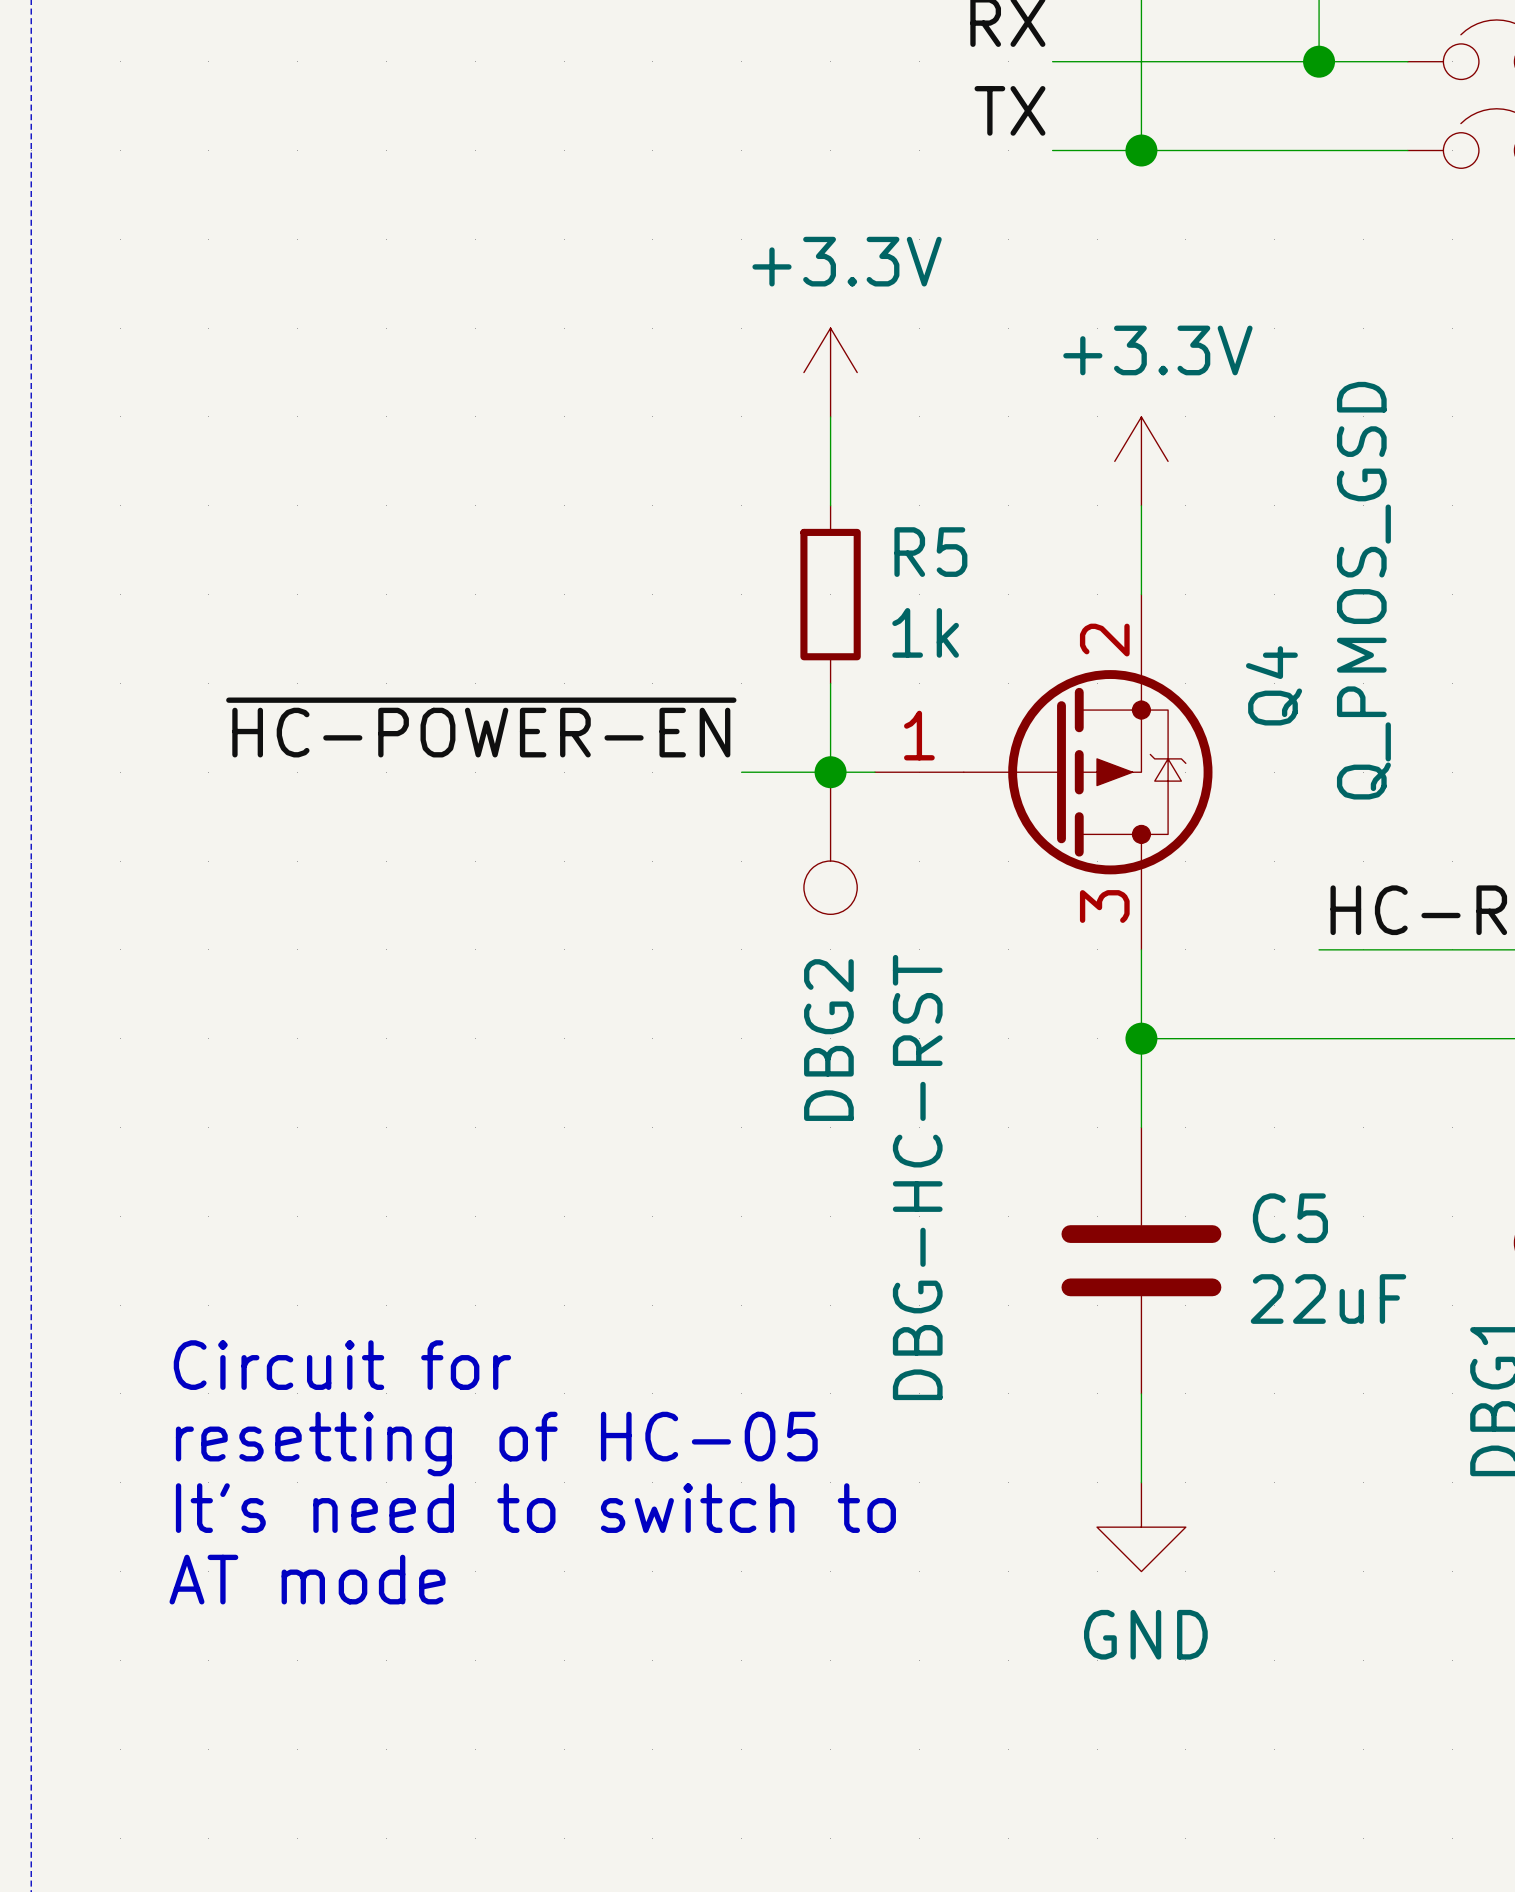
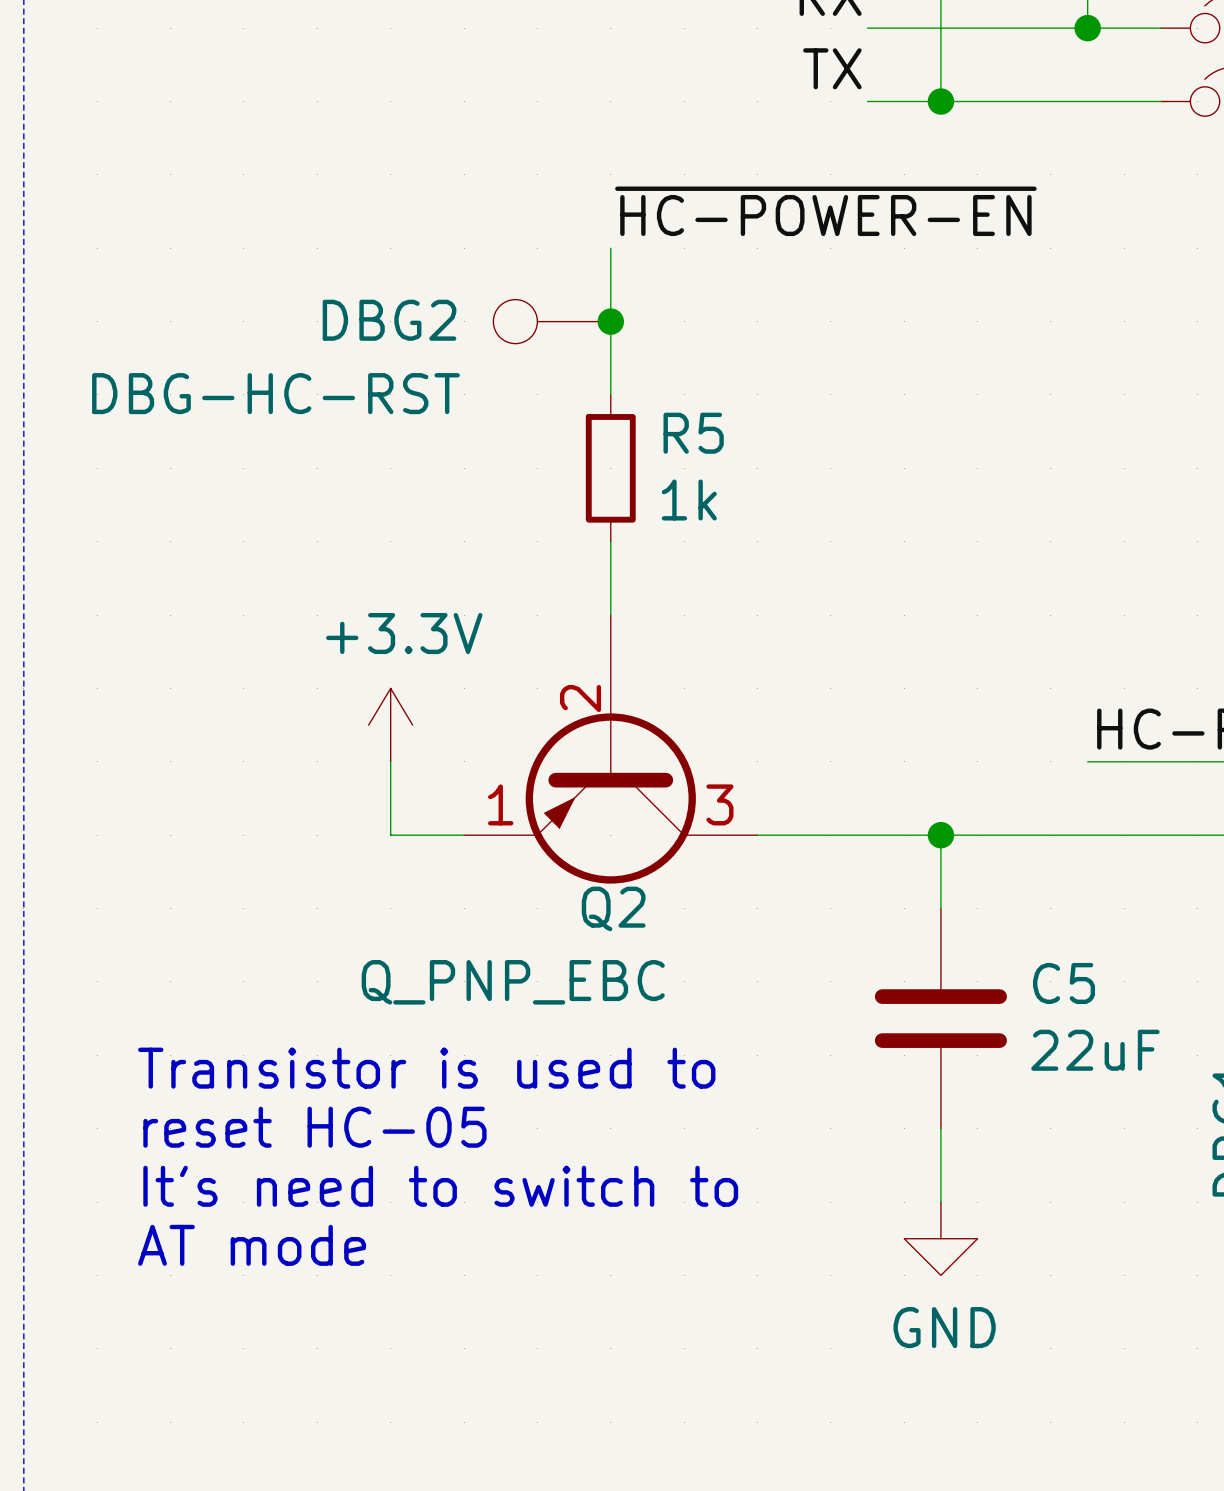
wire: none -> (610, 248) (610, 394)
power symbol: +3.3V (830, 372) -> none
junction: none -> (610, 321)
wire: (830, 416) (830, 505) -> none
power symbol: +3.3V (1141, 461) -> none
wire: (1141, 505) (1141, 594) -> none
R5 position: (830, 594) -> (610, 468)
wire: (830, 683) (830, 772) -> none
label position: ~{HC-POWER-EN} (481, 727) -> ~{HC-POWER-EN} (825, 211)
wire: (741, 772) (874, 772) -> (610, 615) (610, 541)
junction: (830, 772) -> none
Q4: Q_PMOS_GSD (1043, 772) -> none
DBG2 position: (830, 843) -> (552, 321)
DBG2 rotation: 0° (830, 887) -> 90° clockwise (515, 321)
power symbol: none -> +3.3V (390, 725)
Q2: none -> Q_PNP_EBC (610, 749)
wire: none -> (390, 761) (390, 835) (464, 835)
wire: (1141, 949) (1141, 1038) -> (757, 835) (940, 835)
text: none -> Transistor is used to (426, 1068)
text: Circuit for (342, 1365) -> none
text: resetting of HC-05 (496, 1444) -> reset HC-05 (314, 1127)
text position: It's need to switch to (535, 1508) -> It's need to switch to (440, 1186)
text position: AT mode (307, 1579) -> AT mode (252, 1245)

